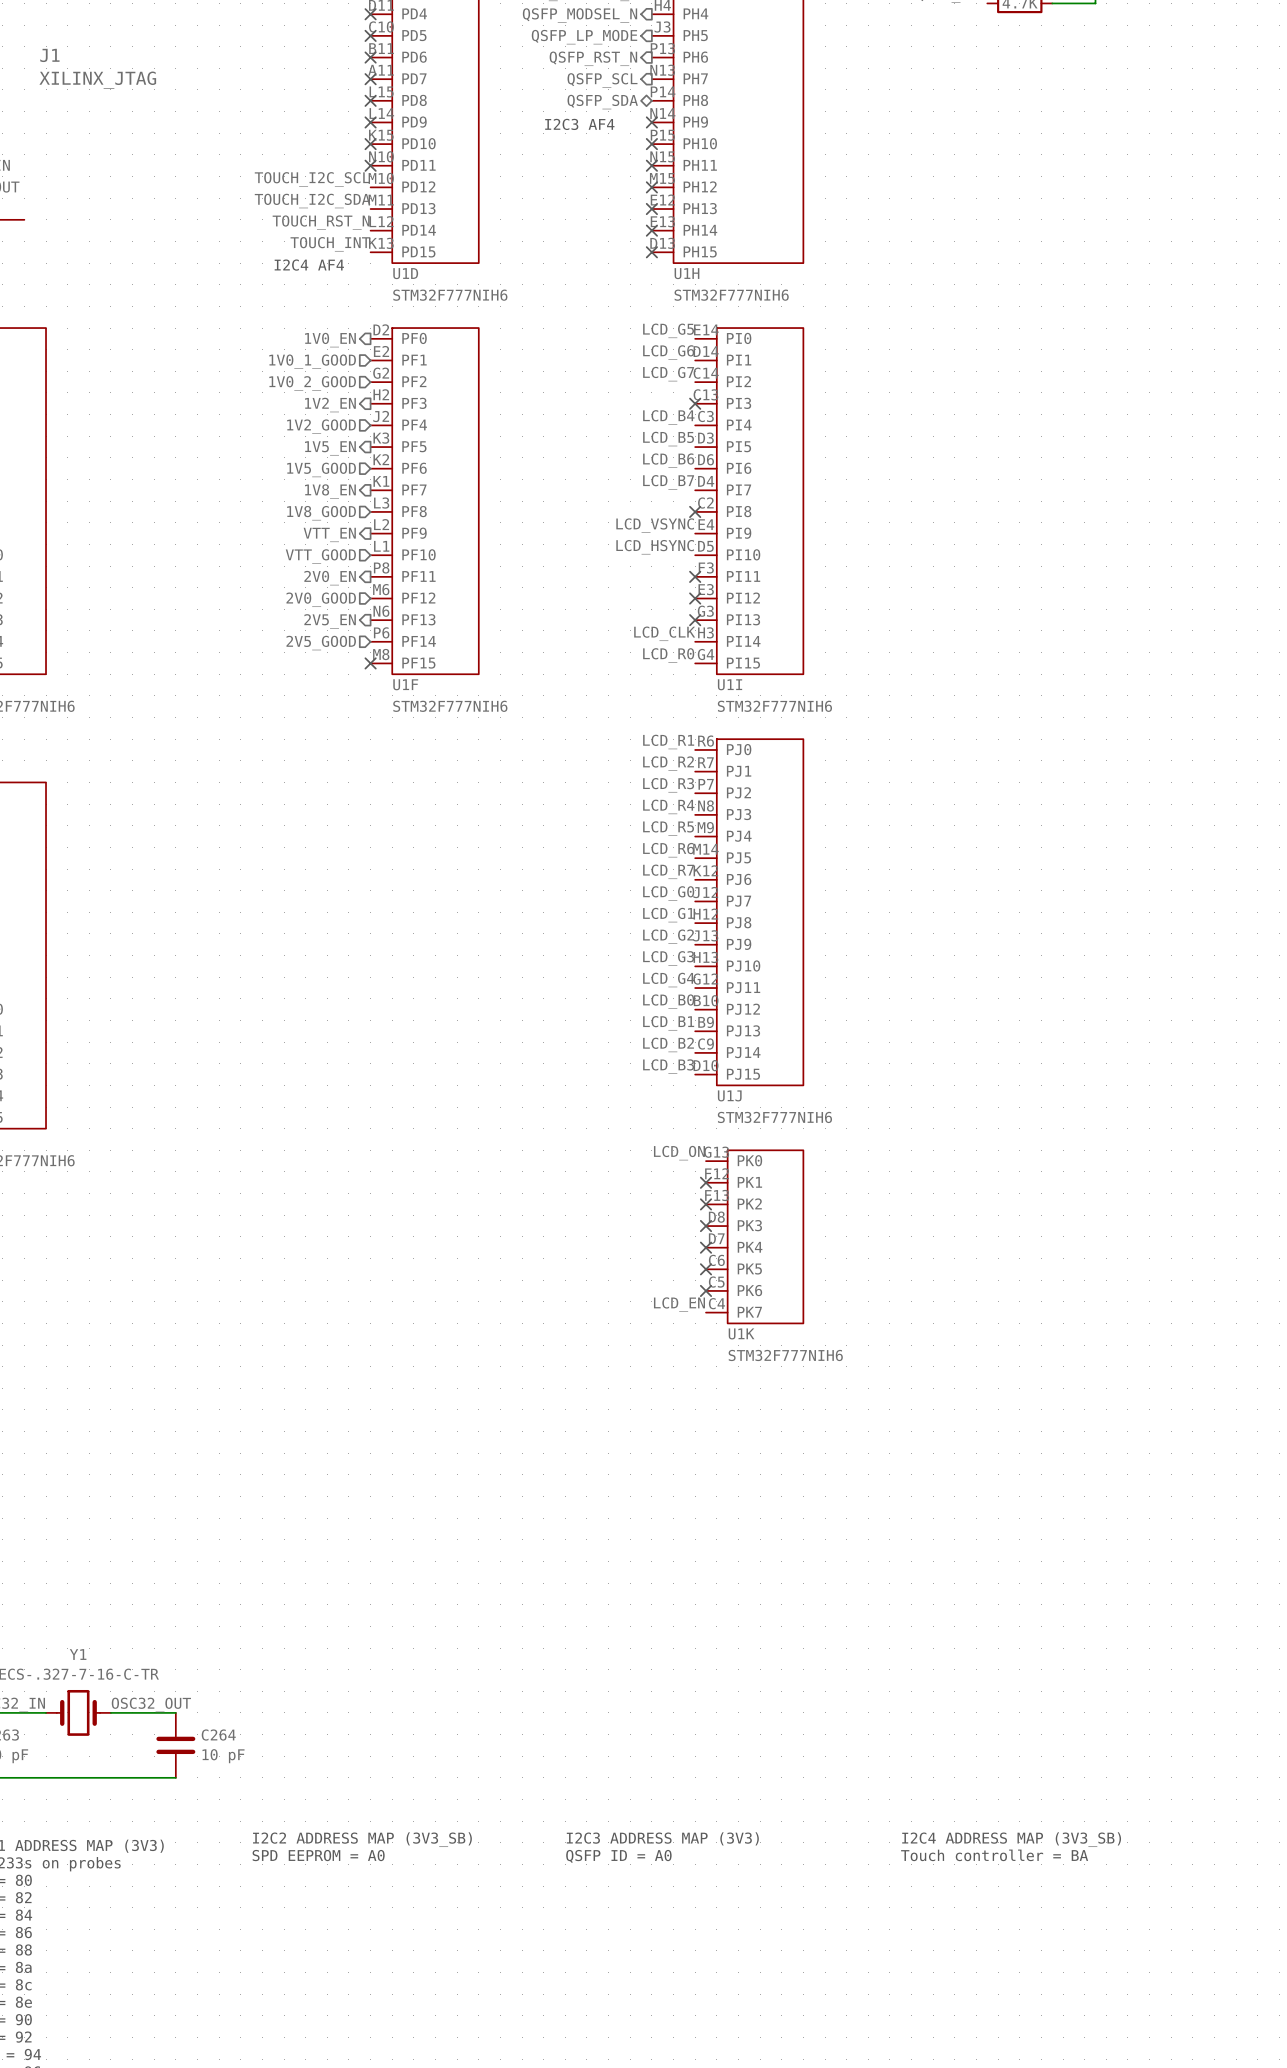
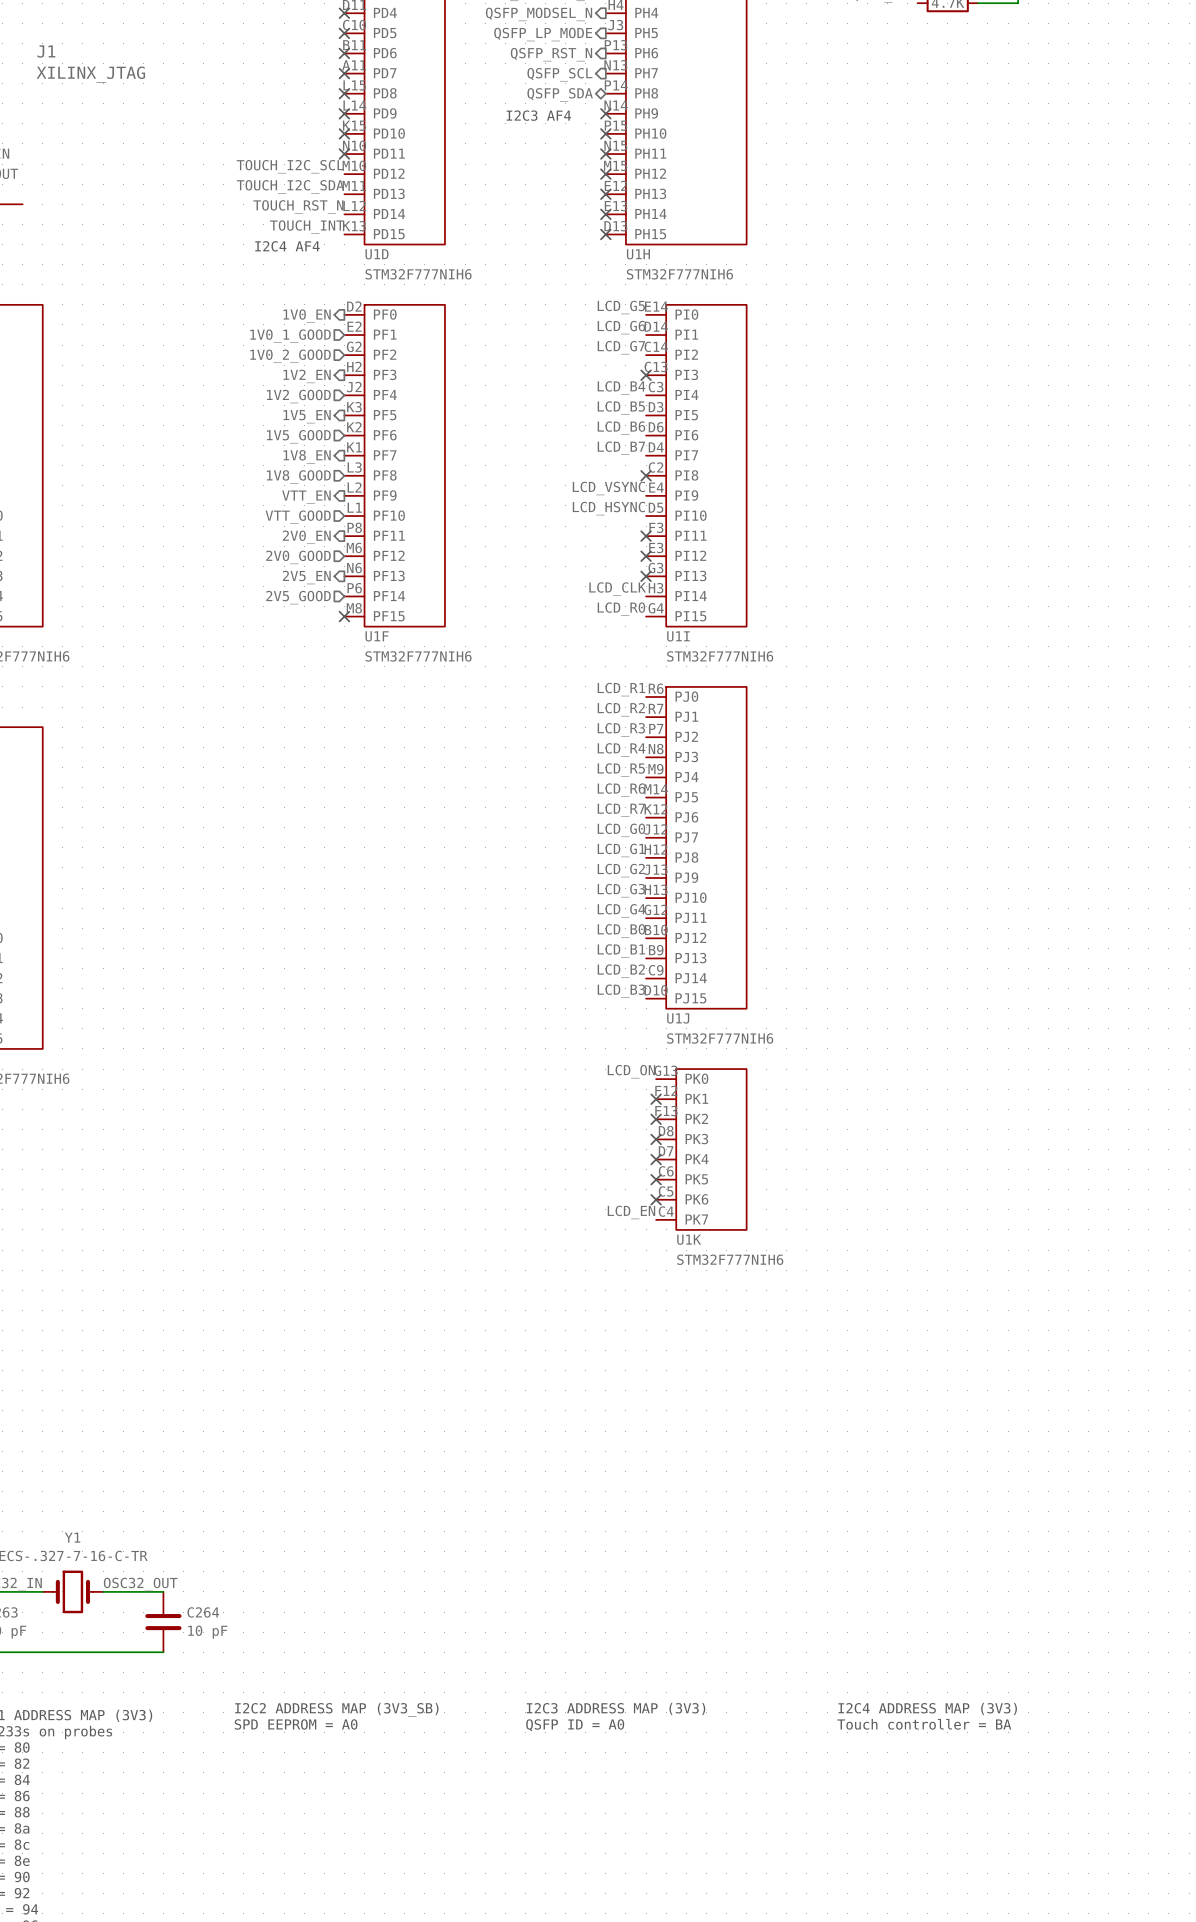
text: I2C4 ADDRESS MAP (3V3_SB) (1011, 1839) -> I2C4 ADDRESS MAP (3V3) (927, 1708)

